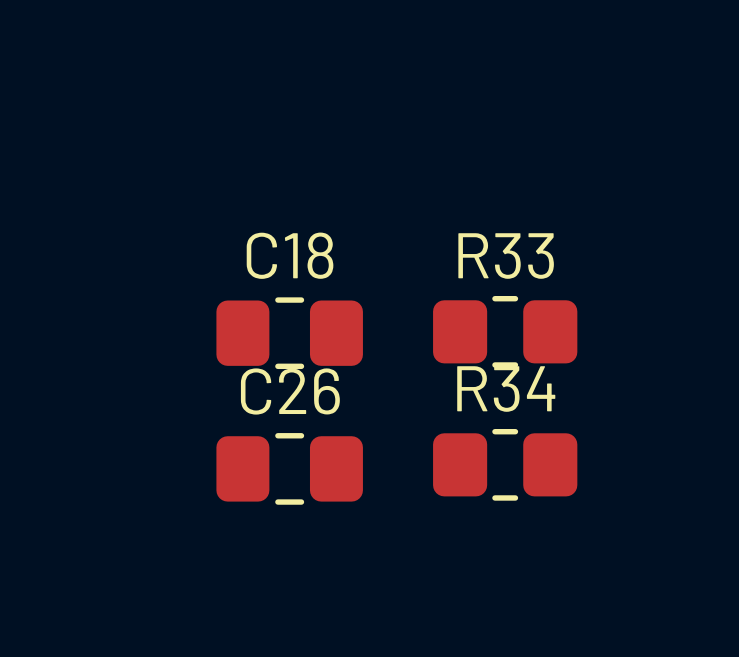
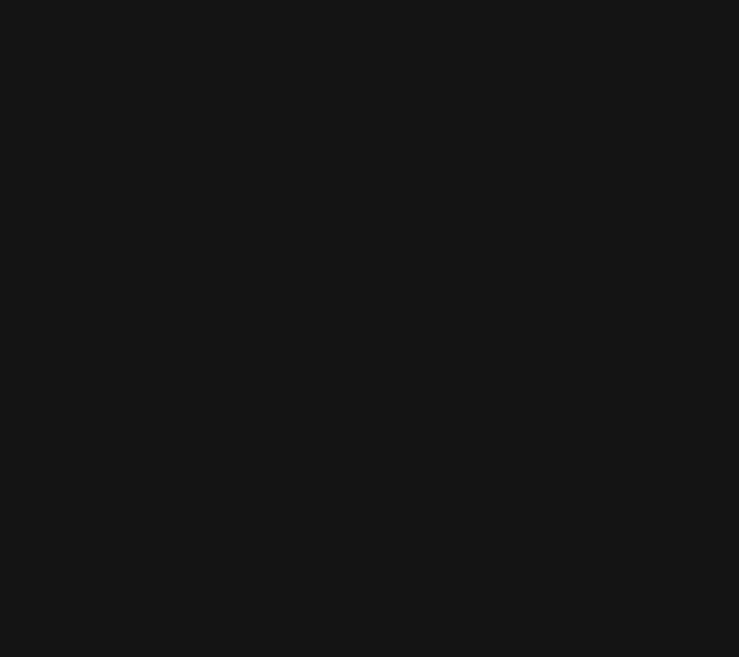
R33: (505, 331) -> none
C18: (289, 333) -> none
R34: (505, 464) -> none
C26: (289, 468) -> none

